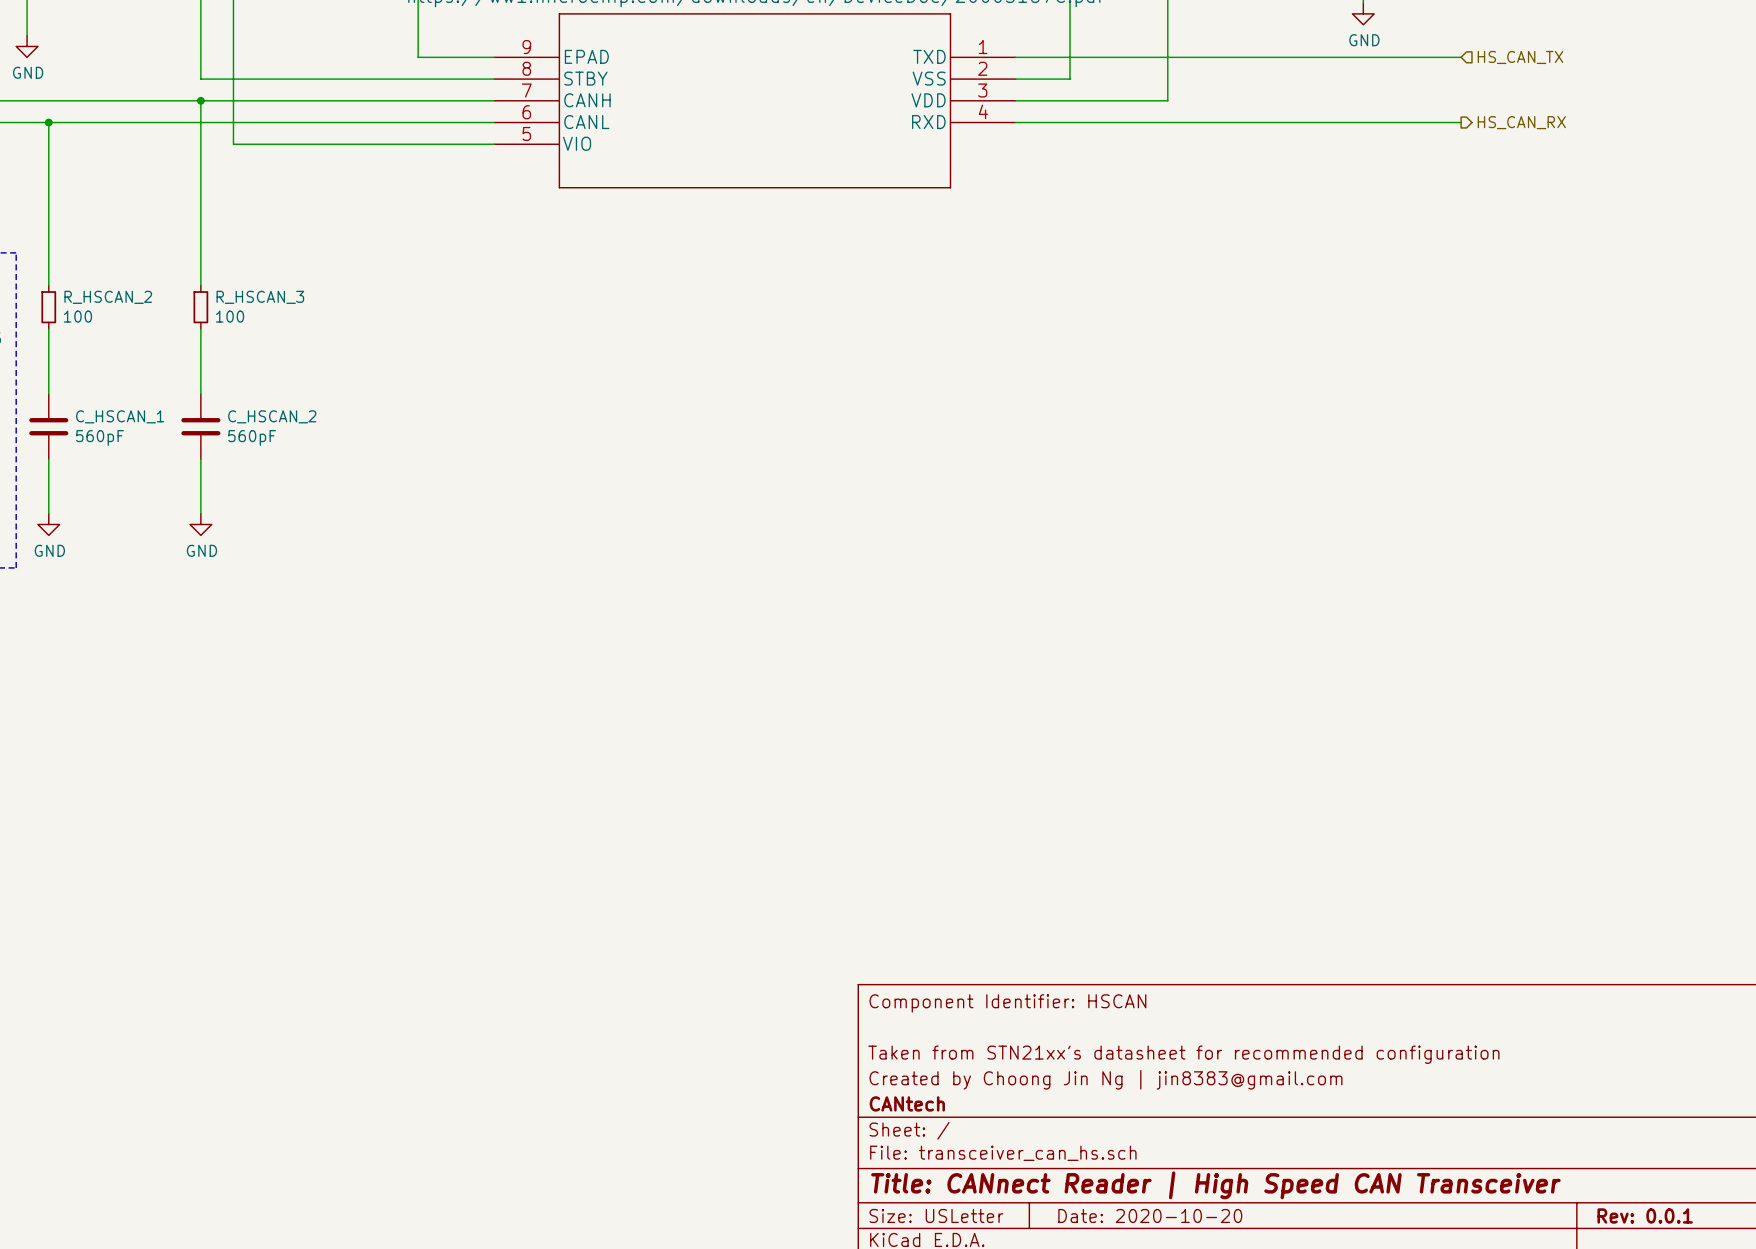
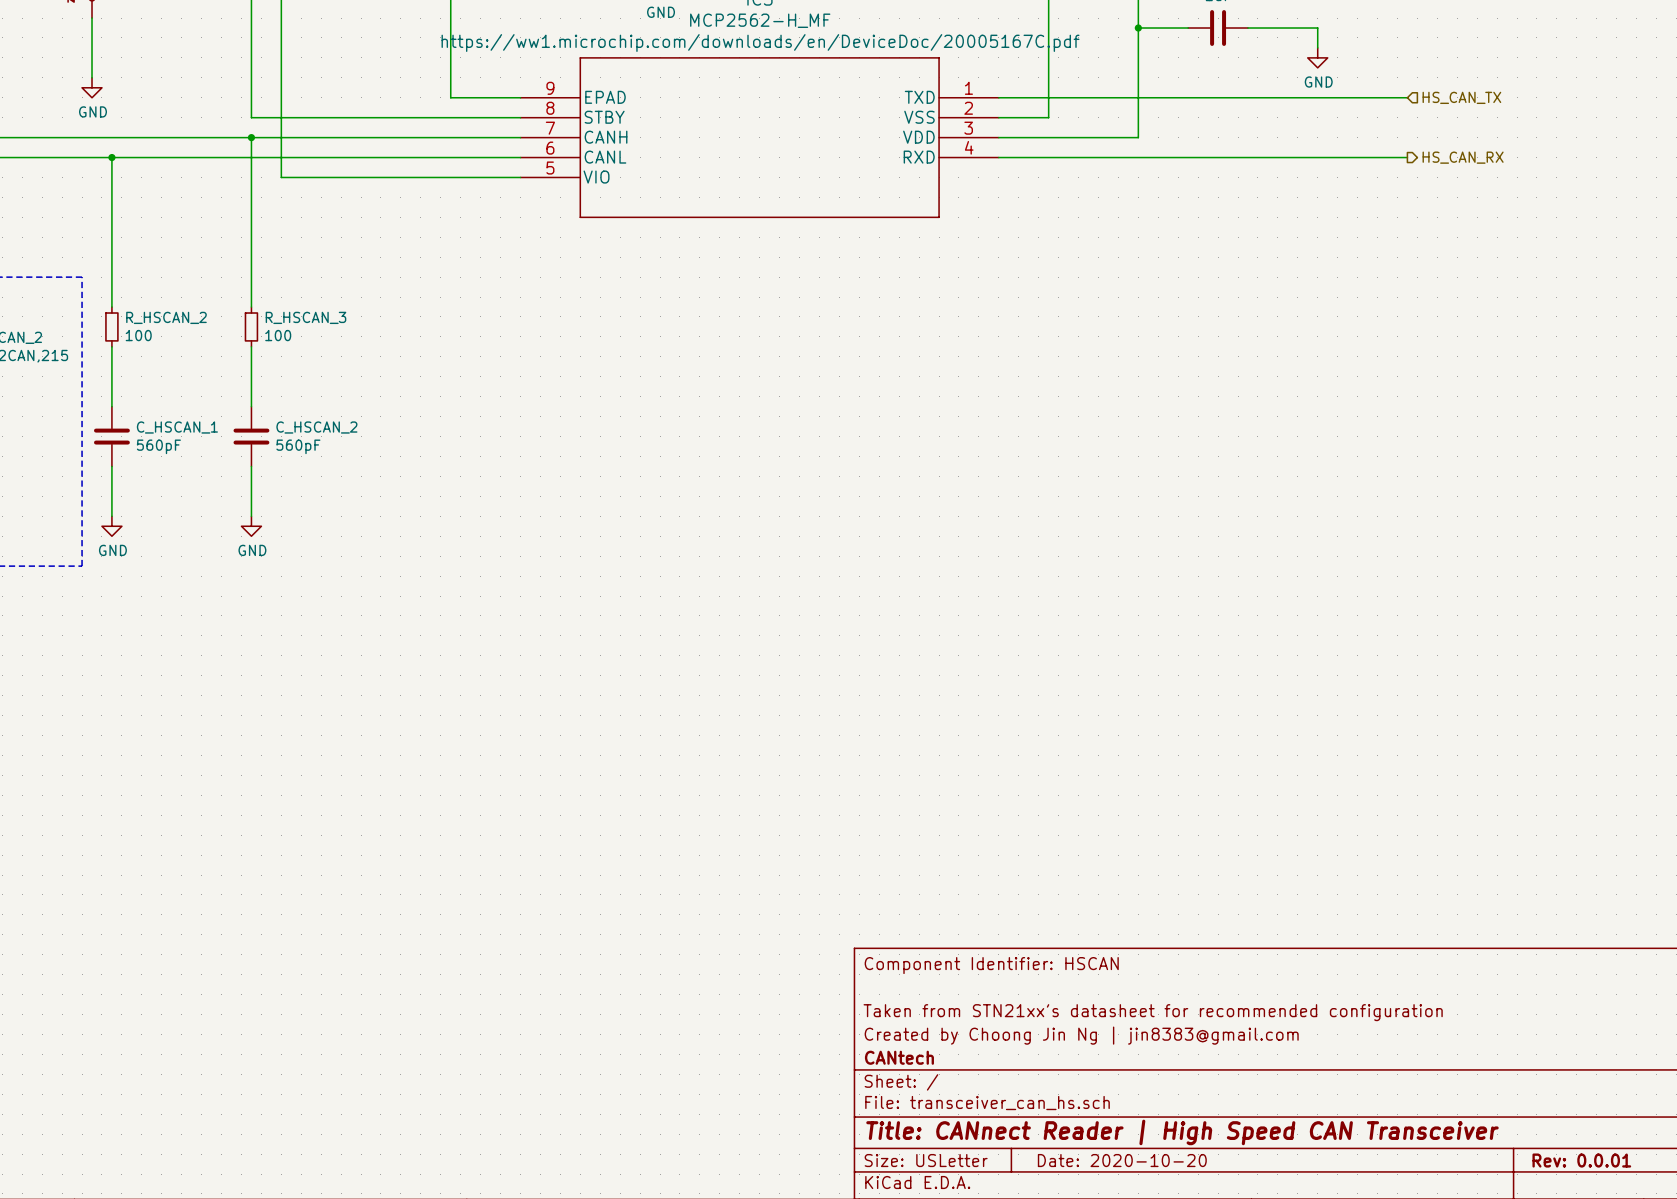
title block: Rev: 0.0.1 (1645, 1215) -> Rev: 0.0.01 (1581, 1160)

